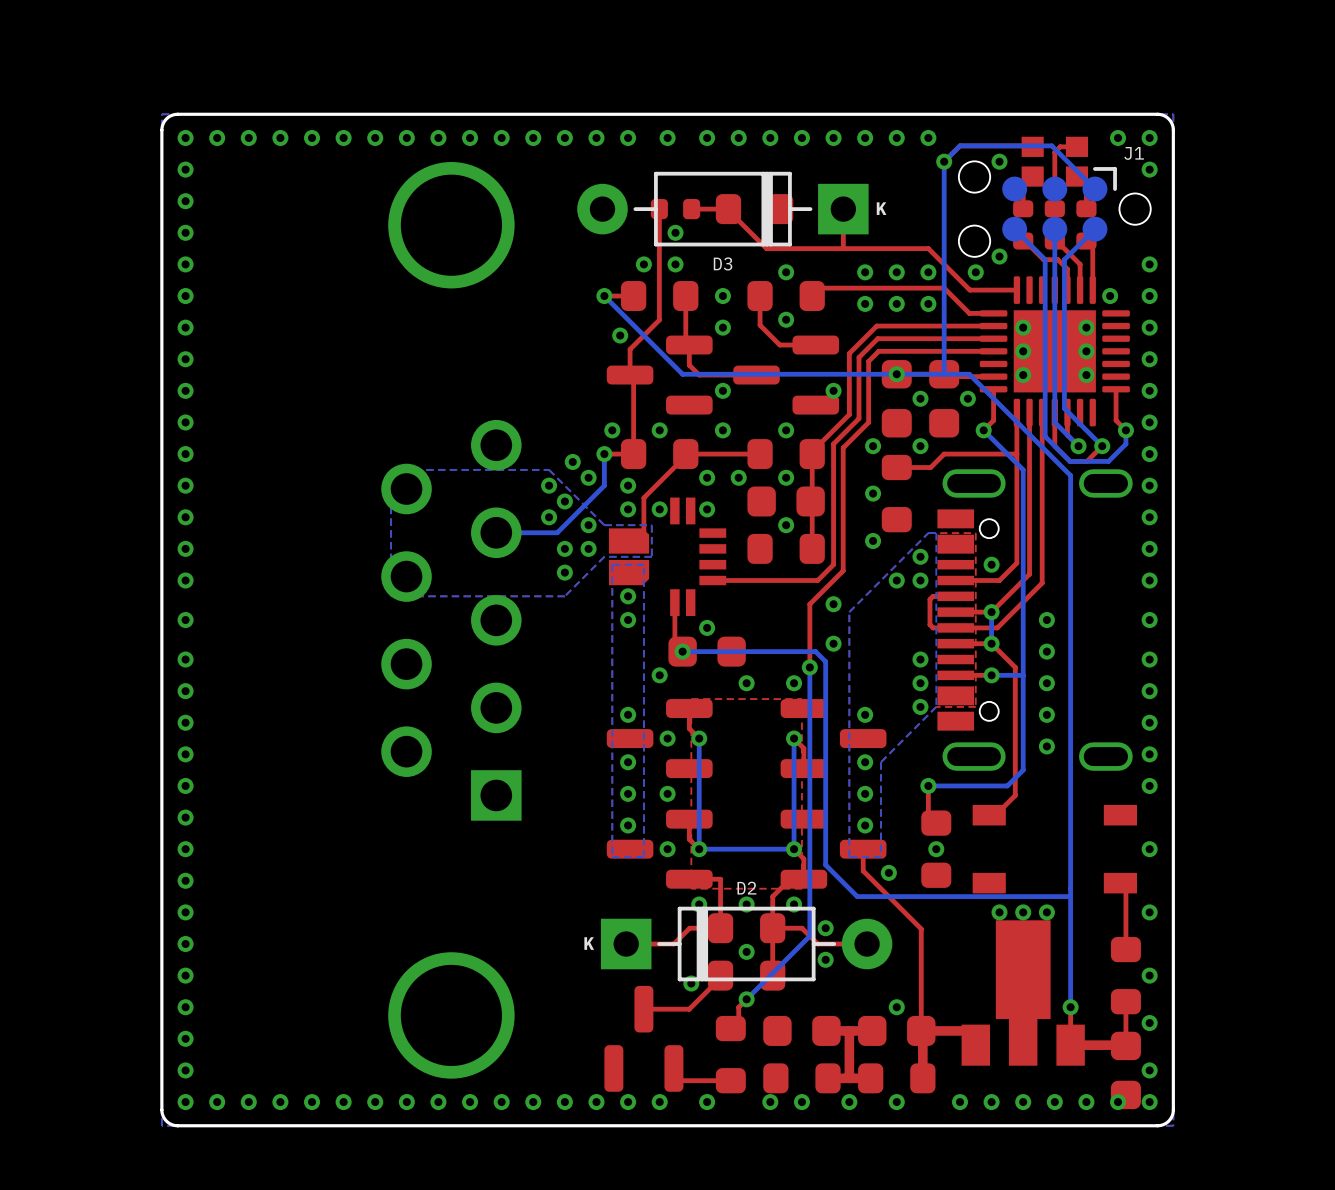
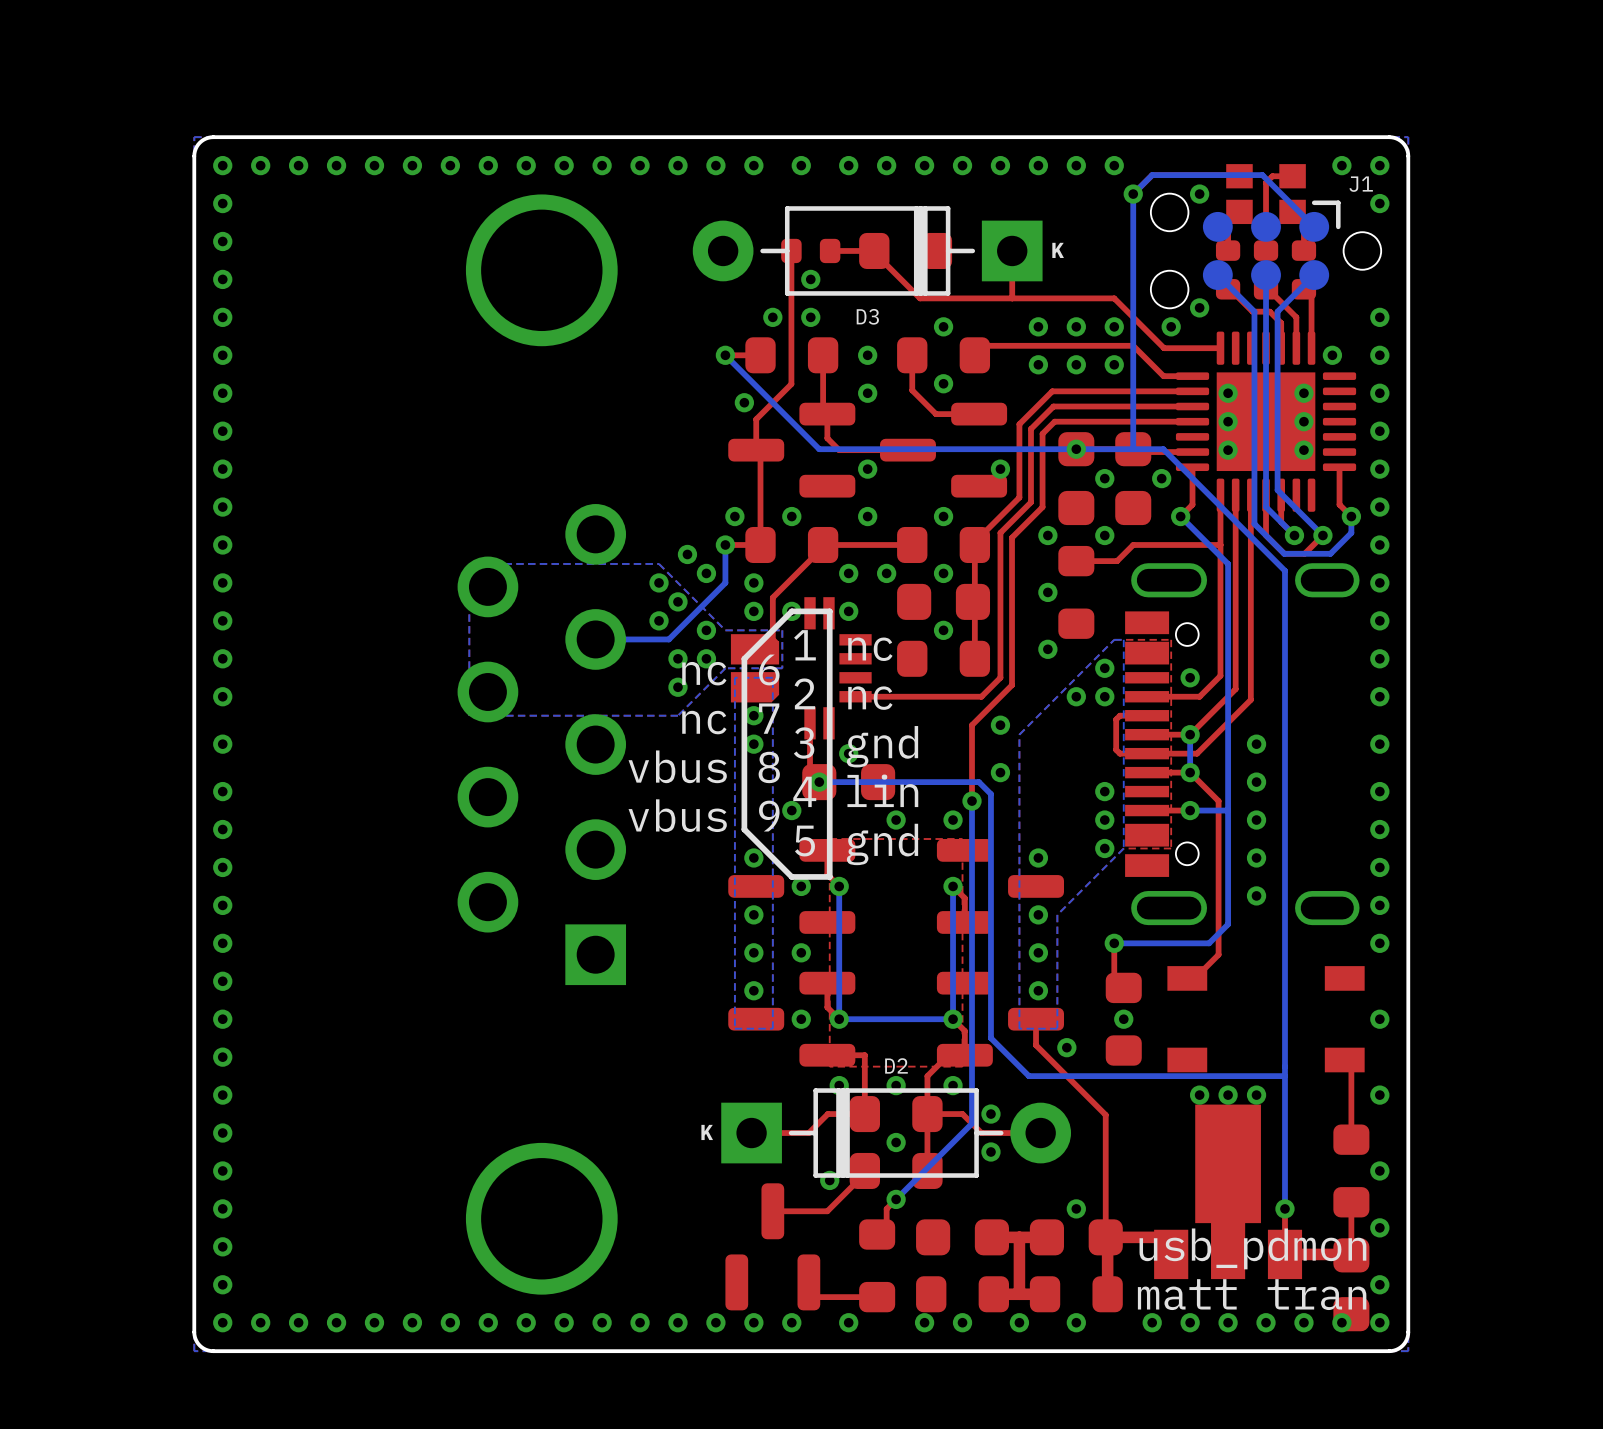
line: none -> (829, 611) (791, 611) (744, 658) (744, 829) (791, 876) (829, 876) (829, 611)
text: none -> 1 nc (843, 645)
text: none -> nc 6 (730, 669)
text: none -> 2 nc (843, 694)
text: none -> nc 7 (730, 718)
text: none -> 3 gnd (856, 746)
text: none -> vbus 8 (704, 766)
text: none -> 4 lin (855, 790)
text: none -> vbus 9 (704, 815)
text: none -> 5 gnd (856, 844)
text: none -> usb_pdmon (1252, 1248)
text: none -> matt tran (1252, 1294)

